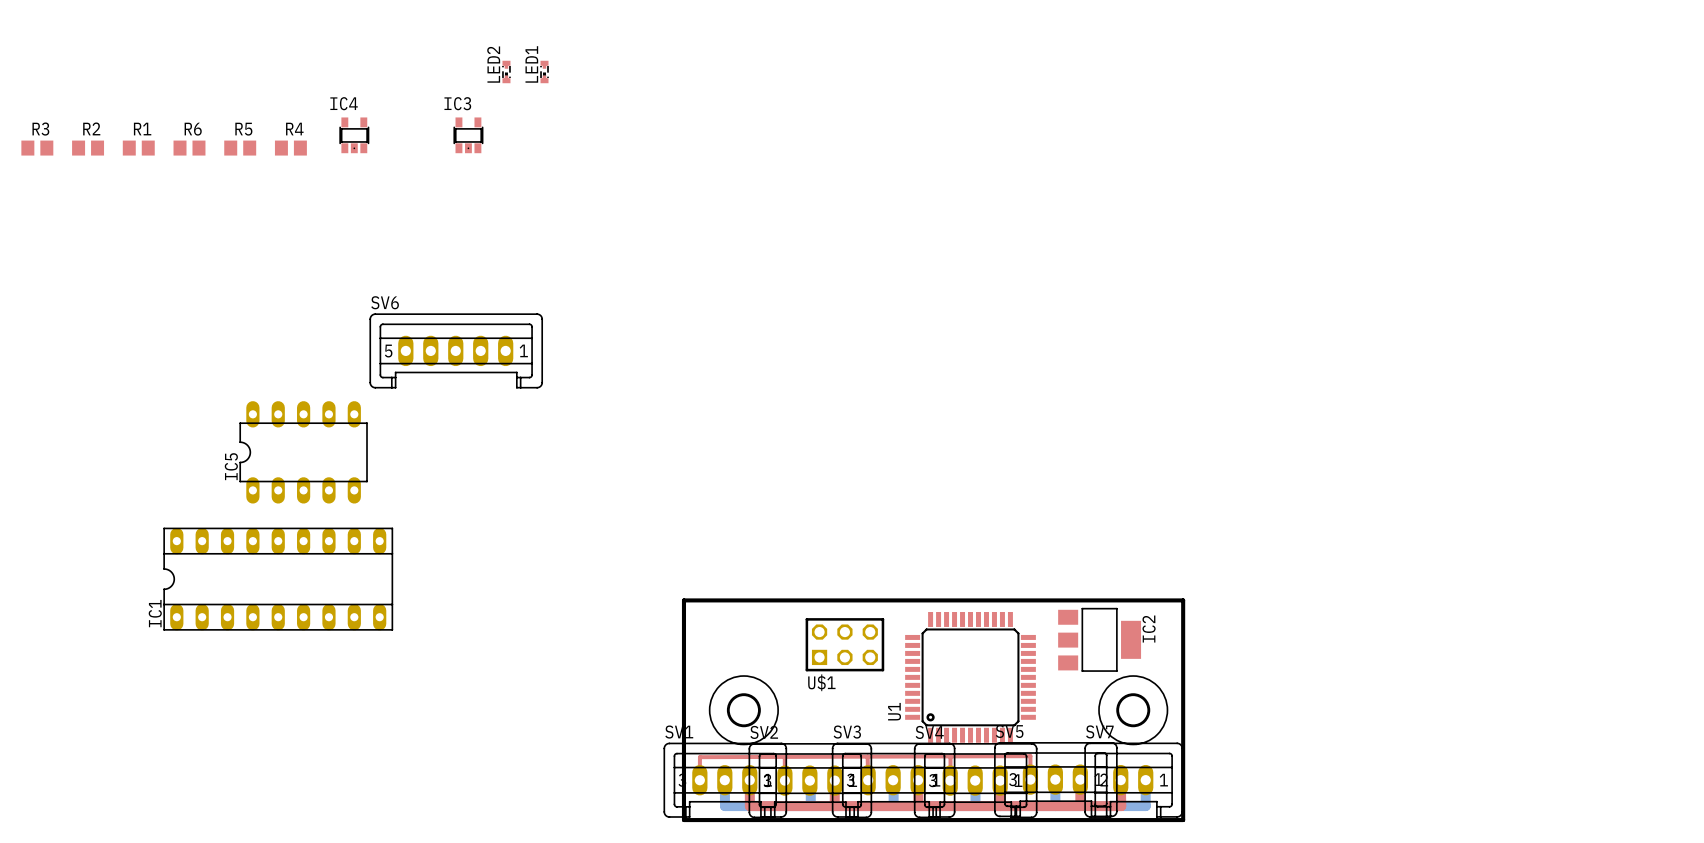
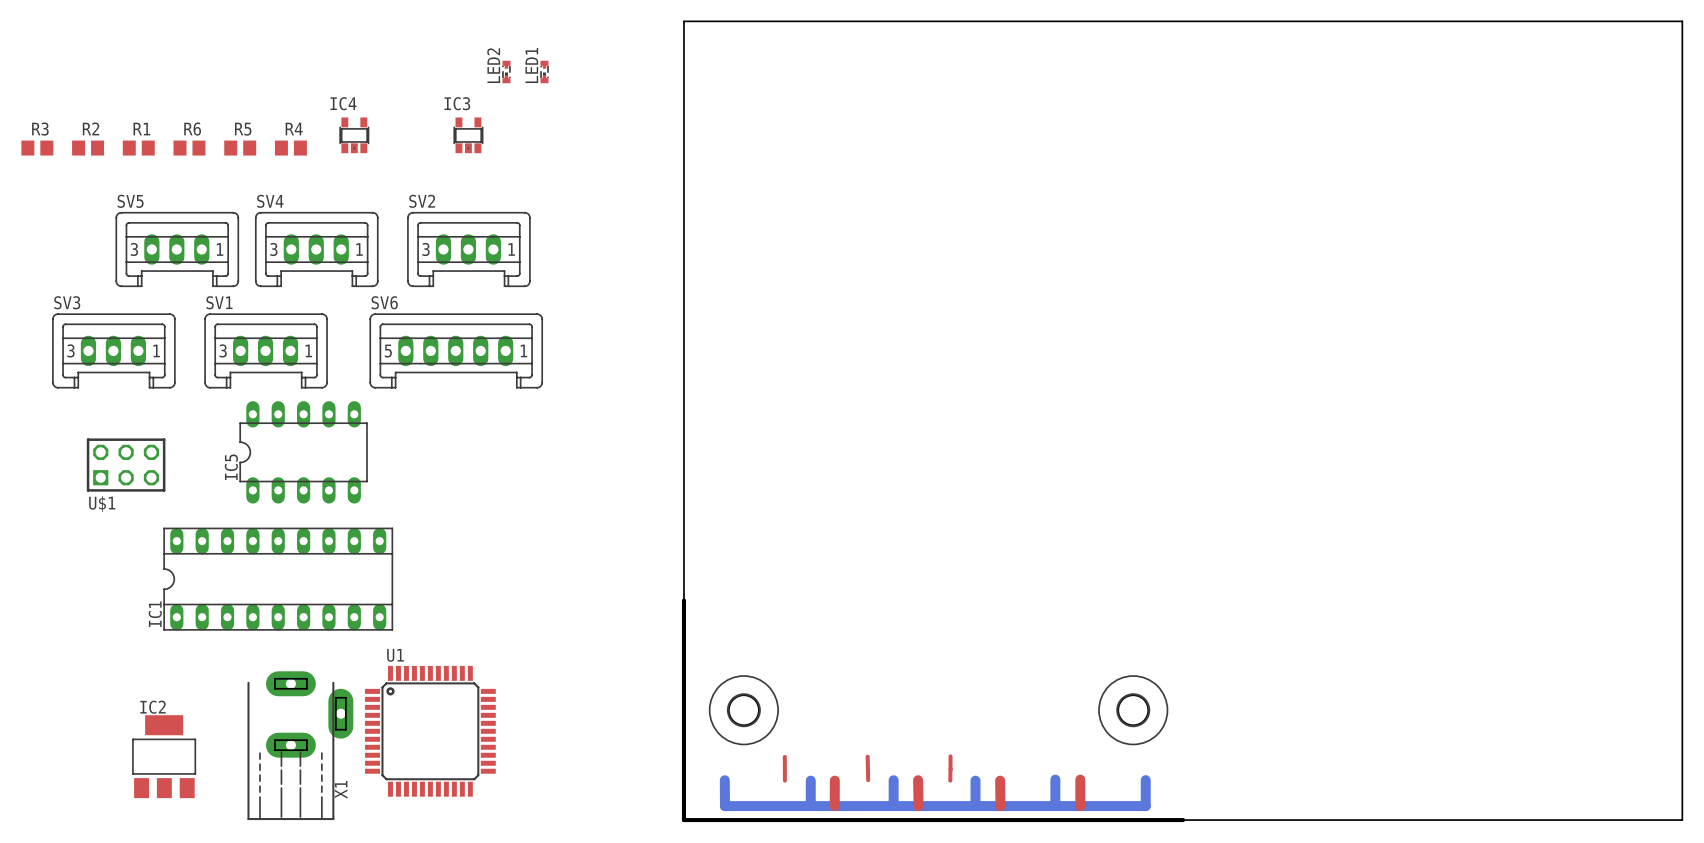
board edge: (683, 600) (1183, 600) (1183, 820) -> (683, 600) (683, 21) (1682, 21) (1682, 820) (1183, 820)
IC2 rotation: 0° (1099, 639) -> 90° counterclockwise (164, 756)
IC2 position: (1099, 639) -> (164, 756)
U$1 position: (844, 644) -> (126, 465)
U1 rotation: 0° (970, 677) -> 90° clockwise (430, 731)
U1 position: (970, 677) -> (430, 731)
X1: none -> (300, 745)
top track: (1030, 779) (1030, 756) (699, 757) (699, 780) -> none
SV5 position: (1055, 779) -> (177, 249)
SV1 position: (725, 780) -> (266, 350)
SV2 position: (810, 780) -> (468, 249)
SV3 position: (893, 780) -> (113, 350)
SV4 position: (975, 780) -> (316, 249)
top track: (1120, 780) (1121, 806) (749, 806) (749, 780) -> none
SV7: (1133, 780) -> none

